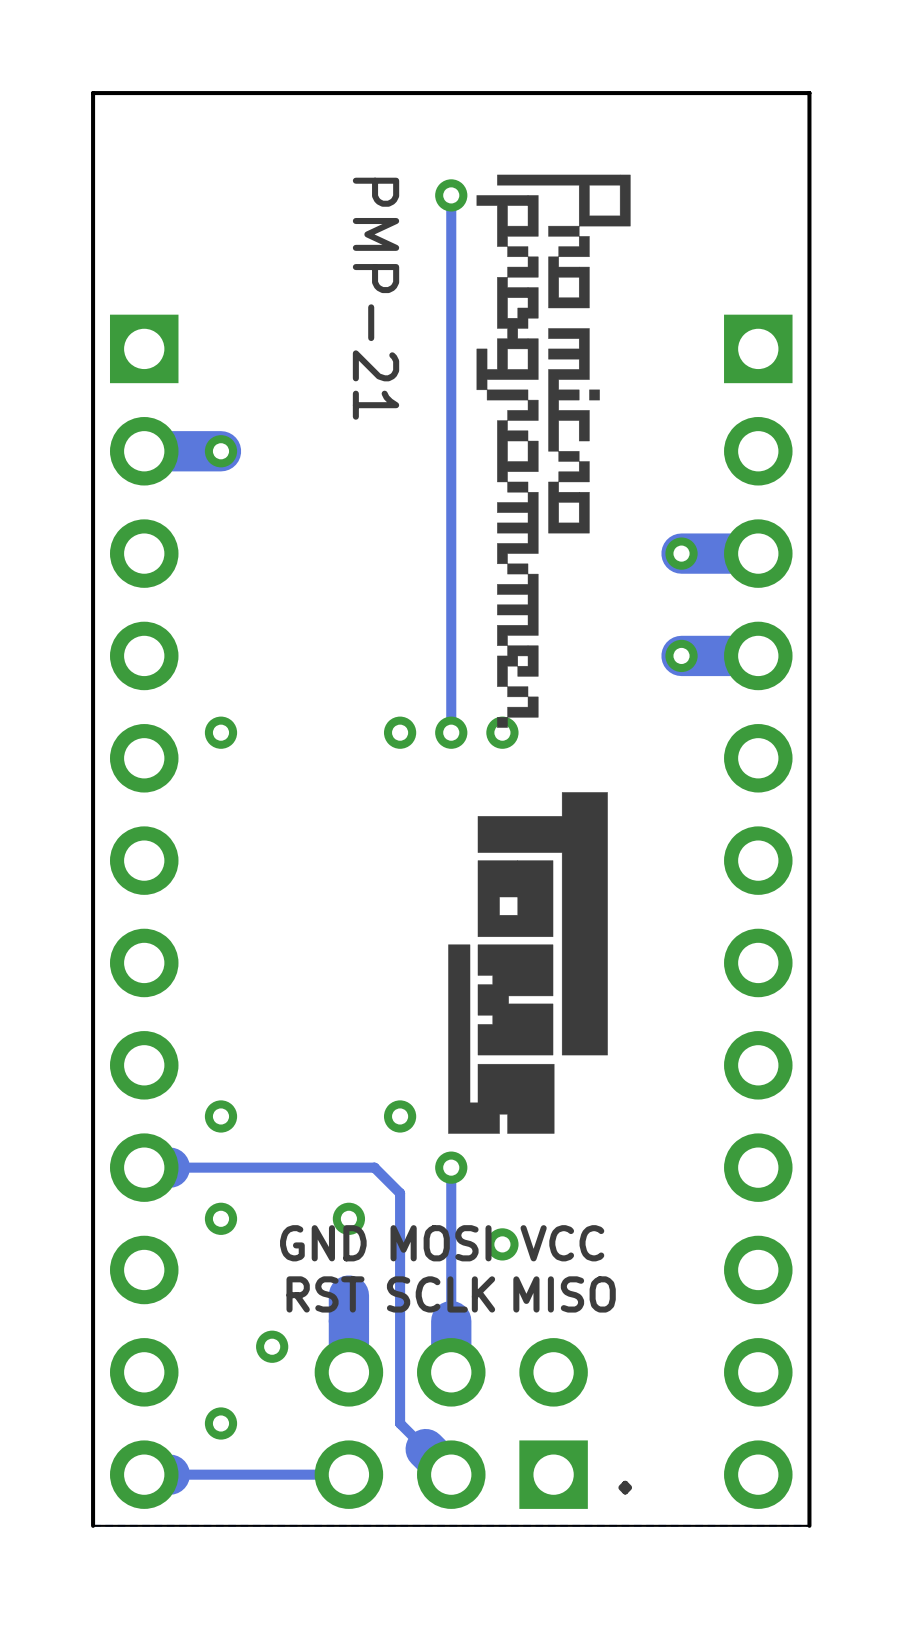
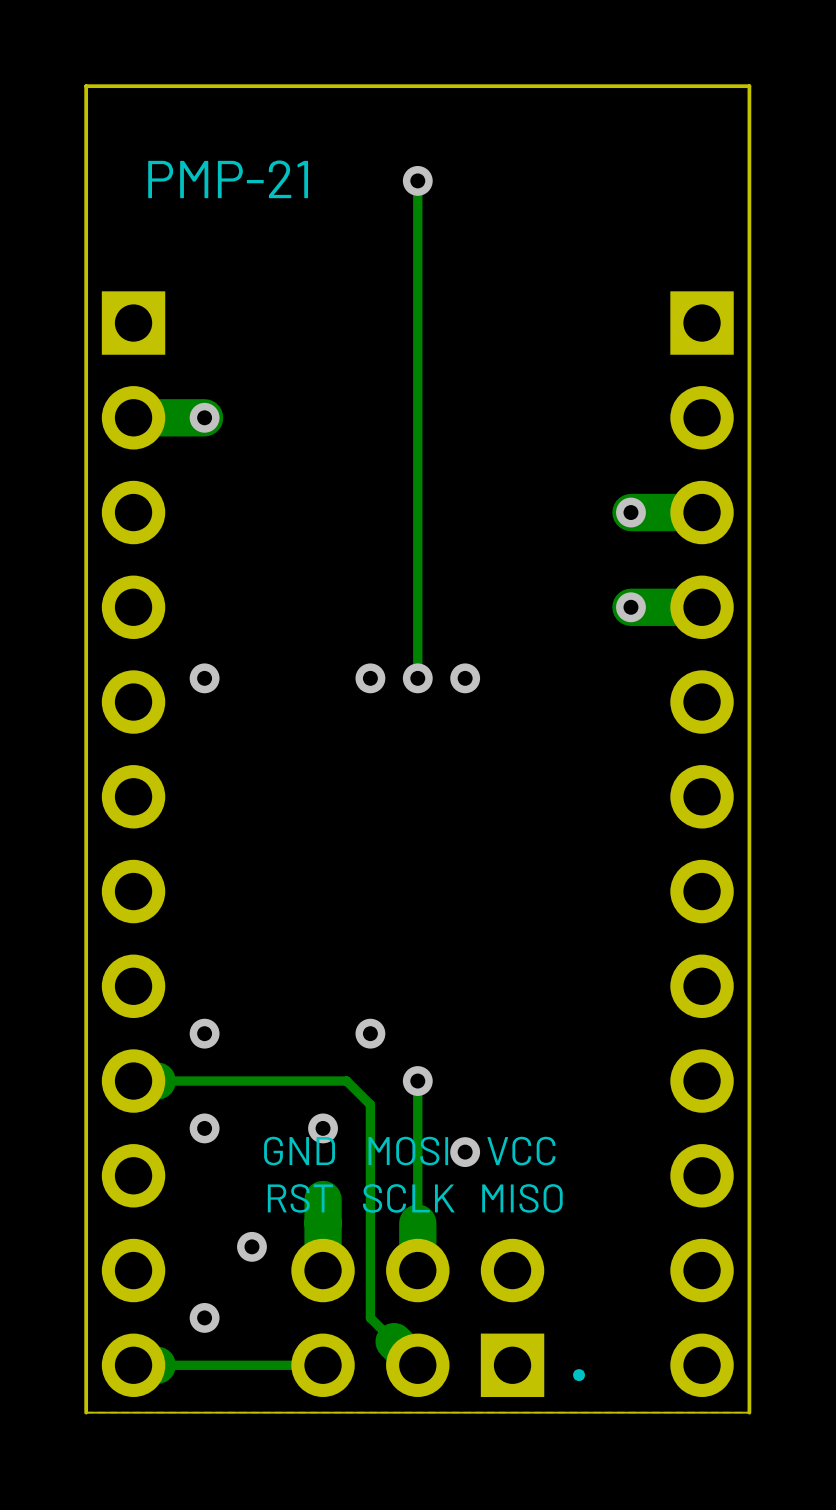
drawing: [476, 174, 631, 728] -> none
text rotation: 0° (376, 298) -> 90° counterclockwise (228, 179)
drawing: [448, 792, 608, 1134] -> none

